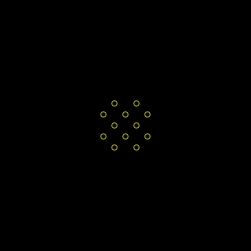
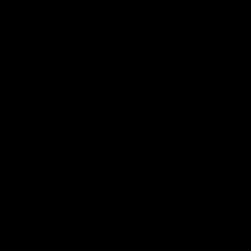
part: (125, 125) -> none

